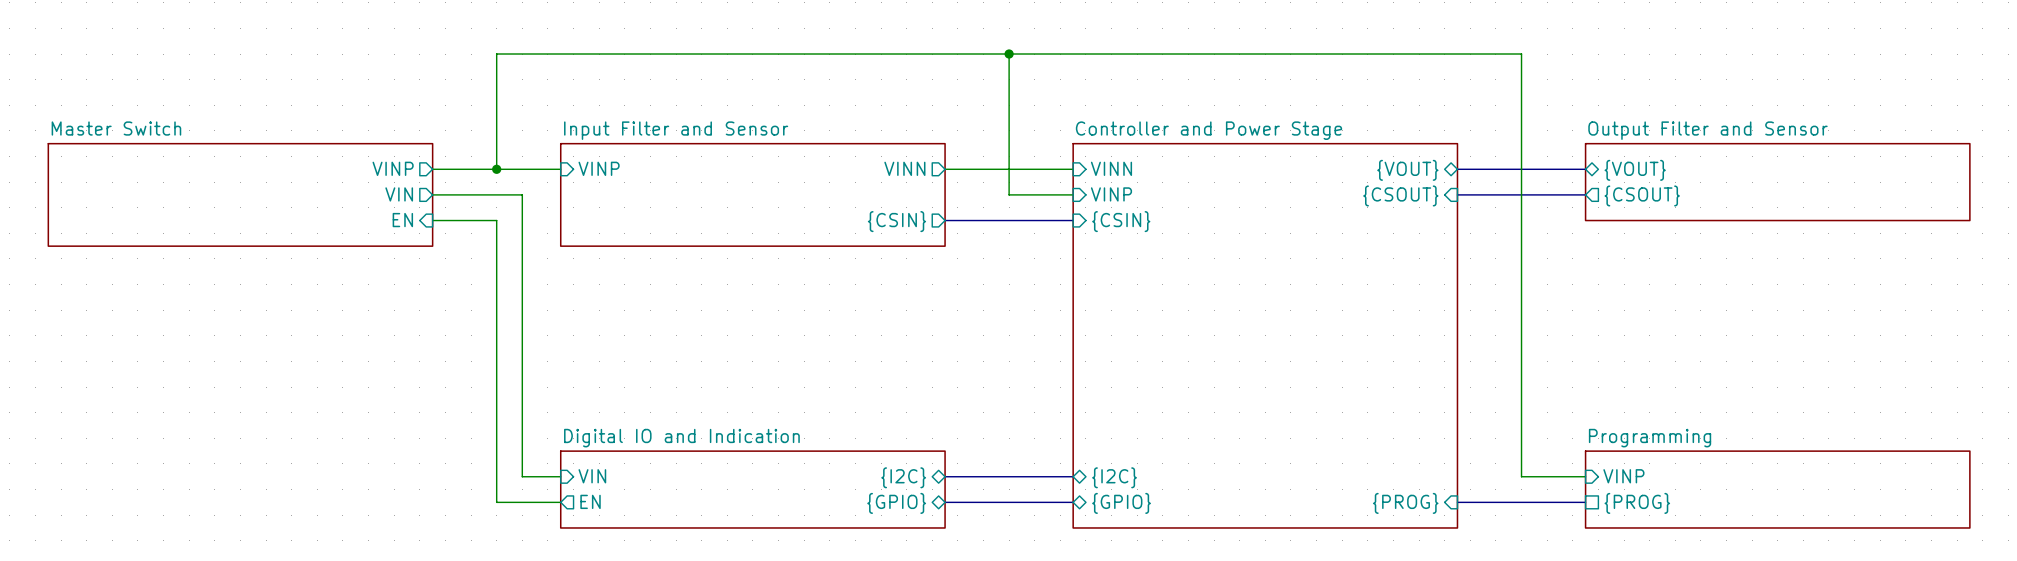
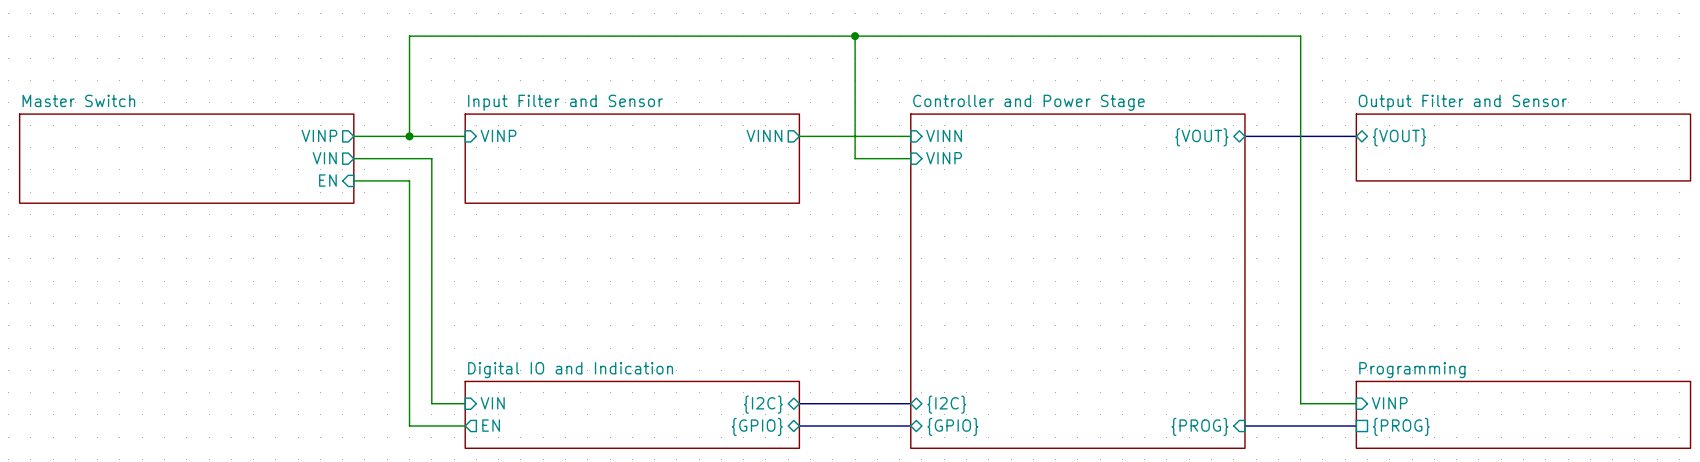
bus: (1457, 194) (1585, 194) -> none
sheet pin: {CSOUT} (1400, 195) -> none
sheet pin: {CSOUT} (1642, 195) -> none
bus: (945, 220) (1073, 220) -> none
sheet pin: {CSIN} (896, 221) -> none
sheet pin: {CSIN} (1121, 221) -> none

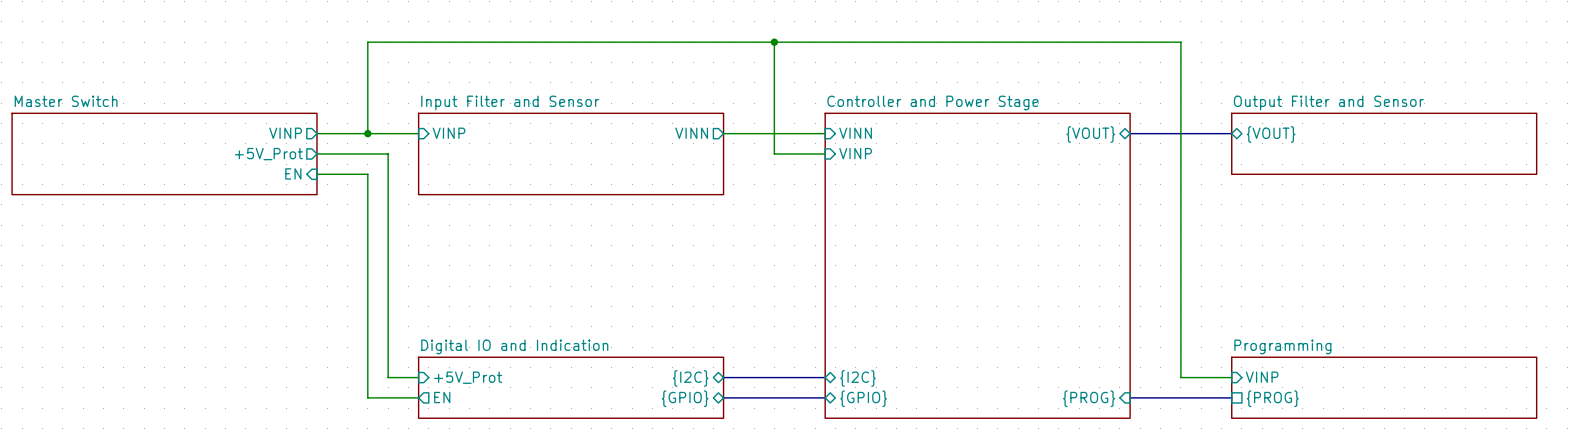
sheet pin: VIN (324, 158) -> +5V_Prot (268, 154)
sheet pin: VIN (492, 403) -> +5V_Prot (468, 377)

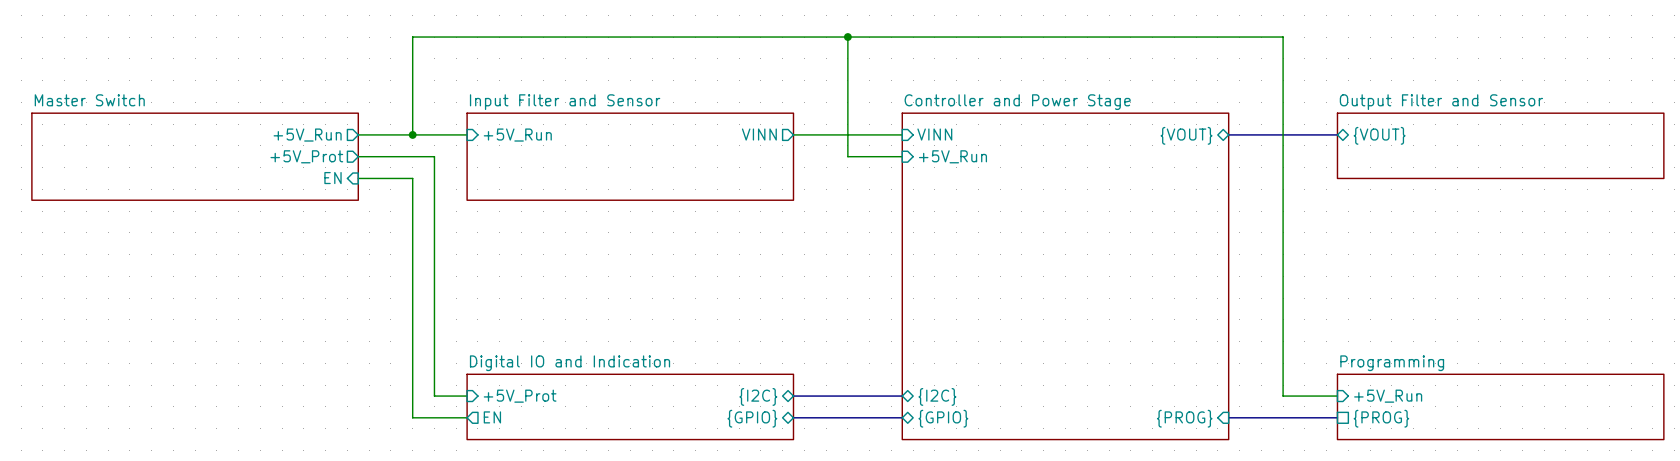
sheet pin: VINP (285, 133) -> +5V_Run (307, 135)
sheet pin: VINP (449, 133) -> +5V_Run (517, 135)
sheet pin: VINP (855, 153) -> +5V_Run (952, 156)
sheet pin: VINP (1262, 377) -> +5V_Run (1388, 396)

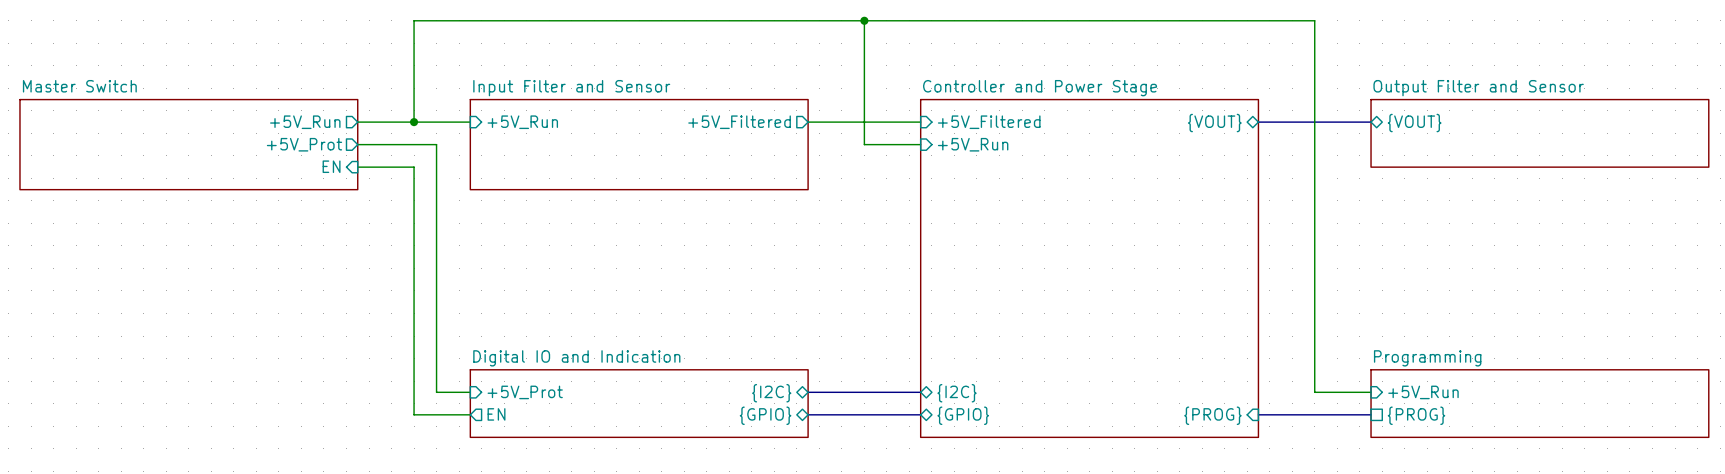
sheet pin: VINN (759, 134) -> +5V_Filtered (739, 122)
sheet pin: VINN (934, 134) -> +5V_Filtered (989, 122)

